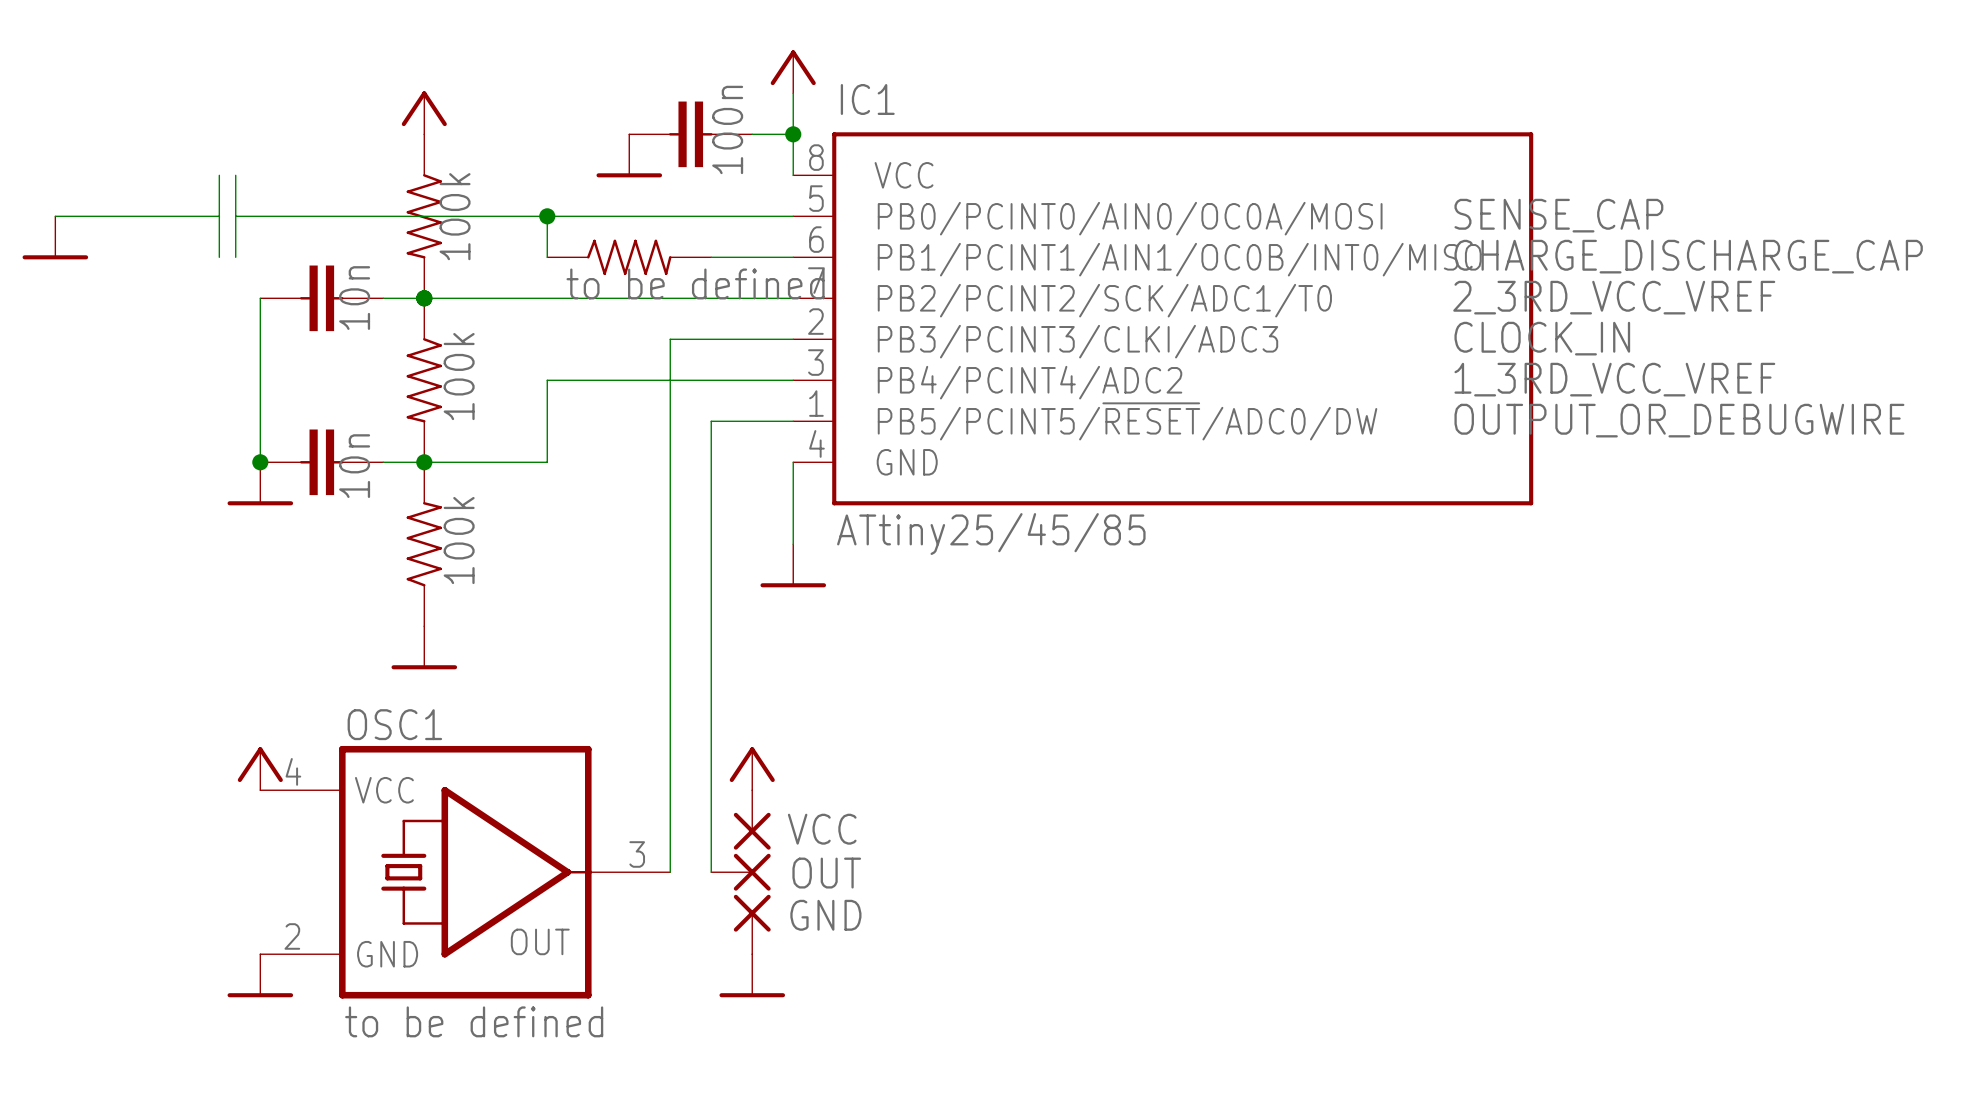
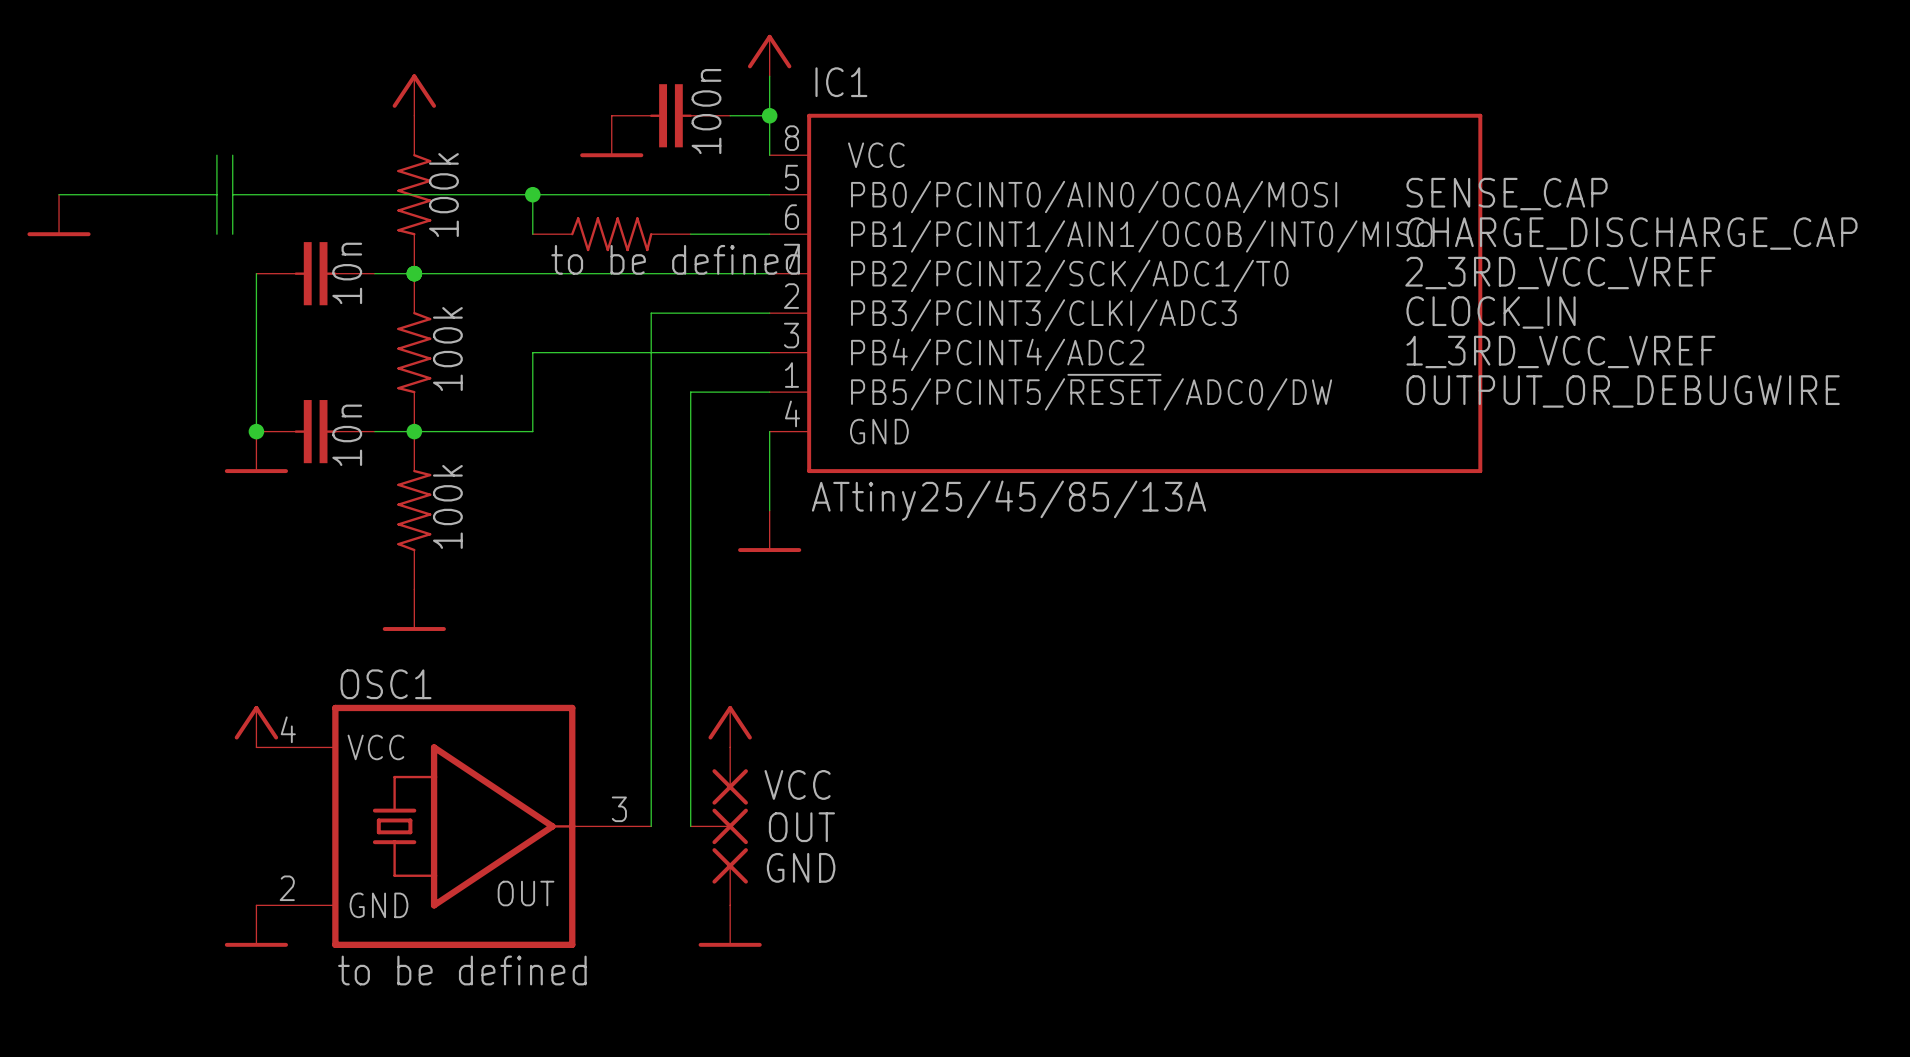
IC1 value: ATtiny25/45/85 (991, 534) -> ATtiny25/45/85/13A (1008, 500)

